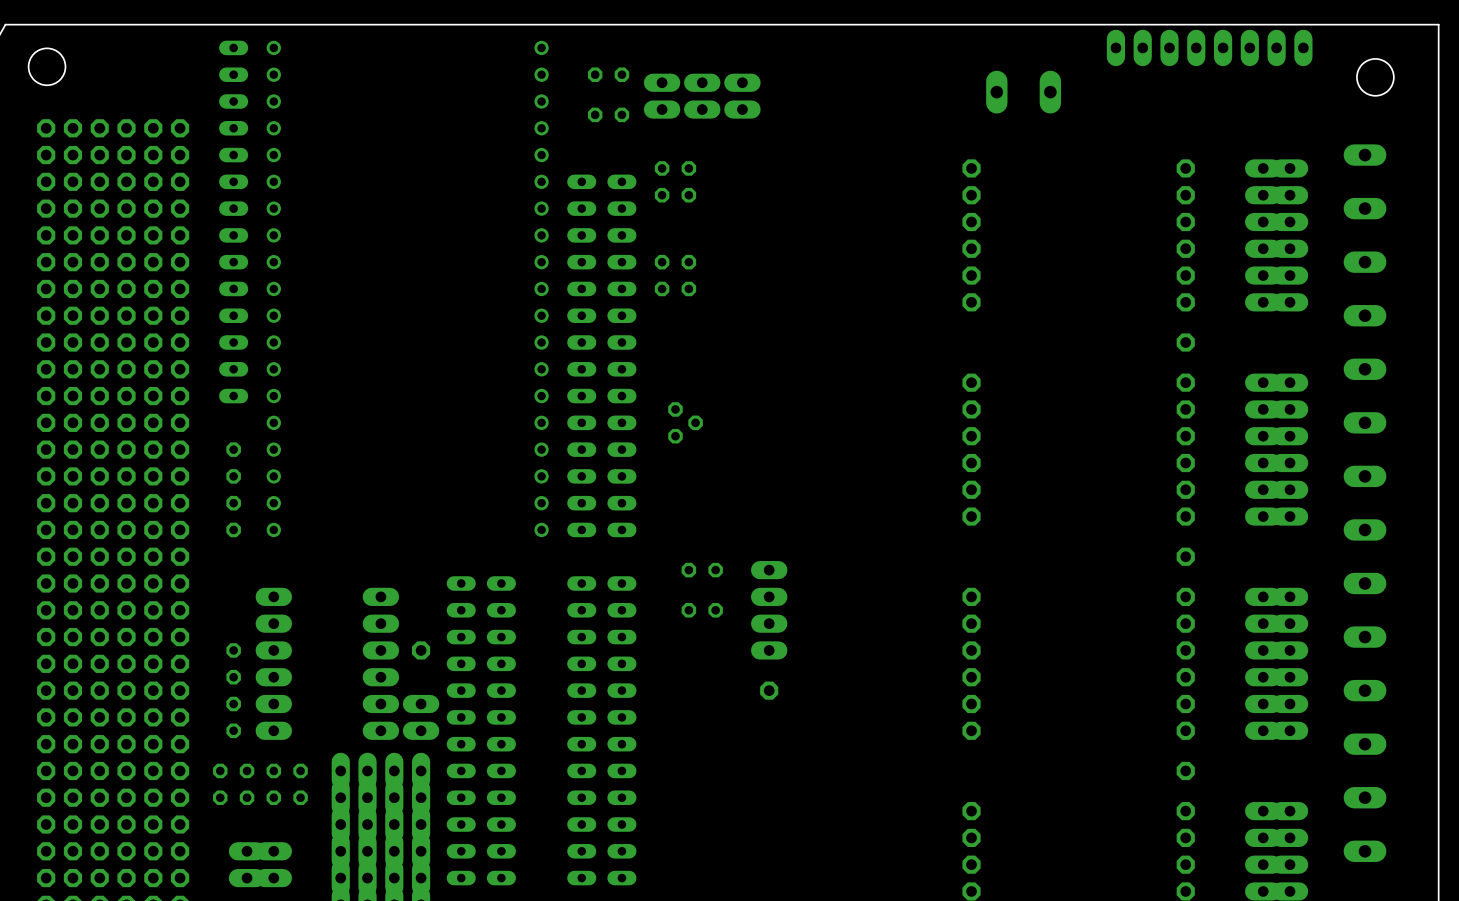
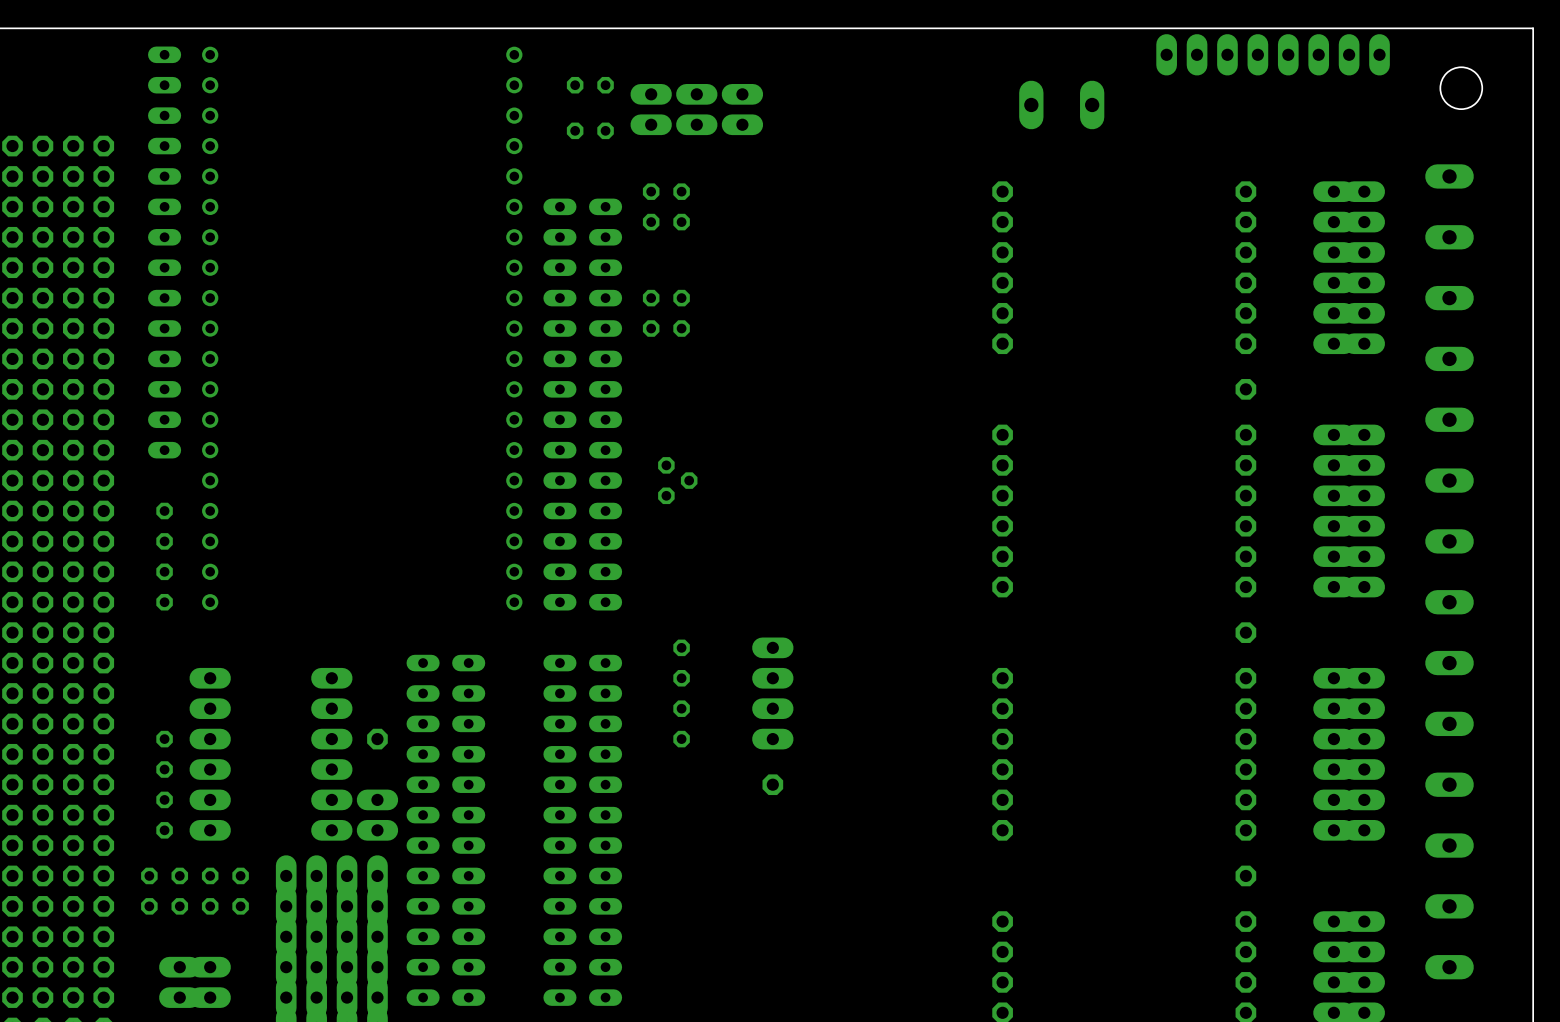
part: (702, 570) -> none
part: none -> (681, 663)
part: (702, 610) -> none
part: none -> (681, 723)

